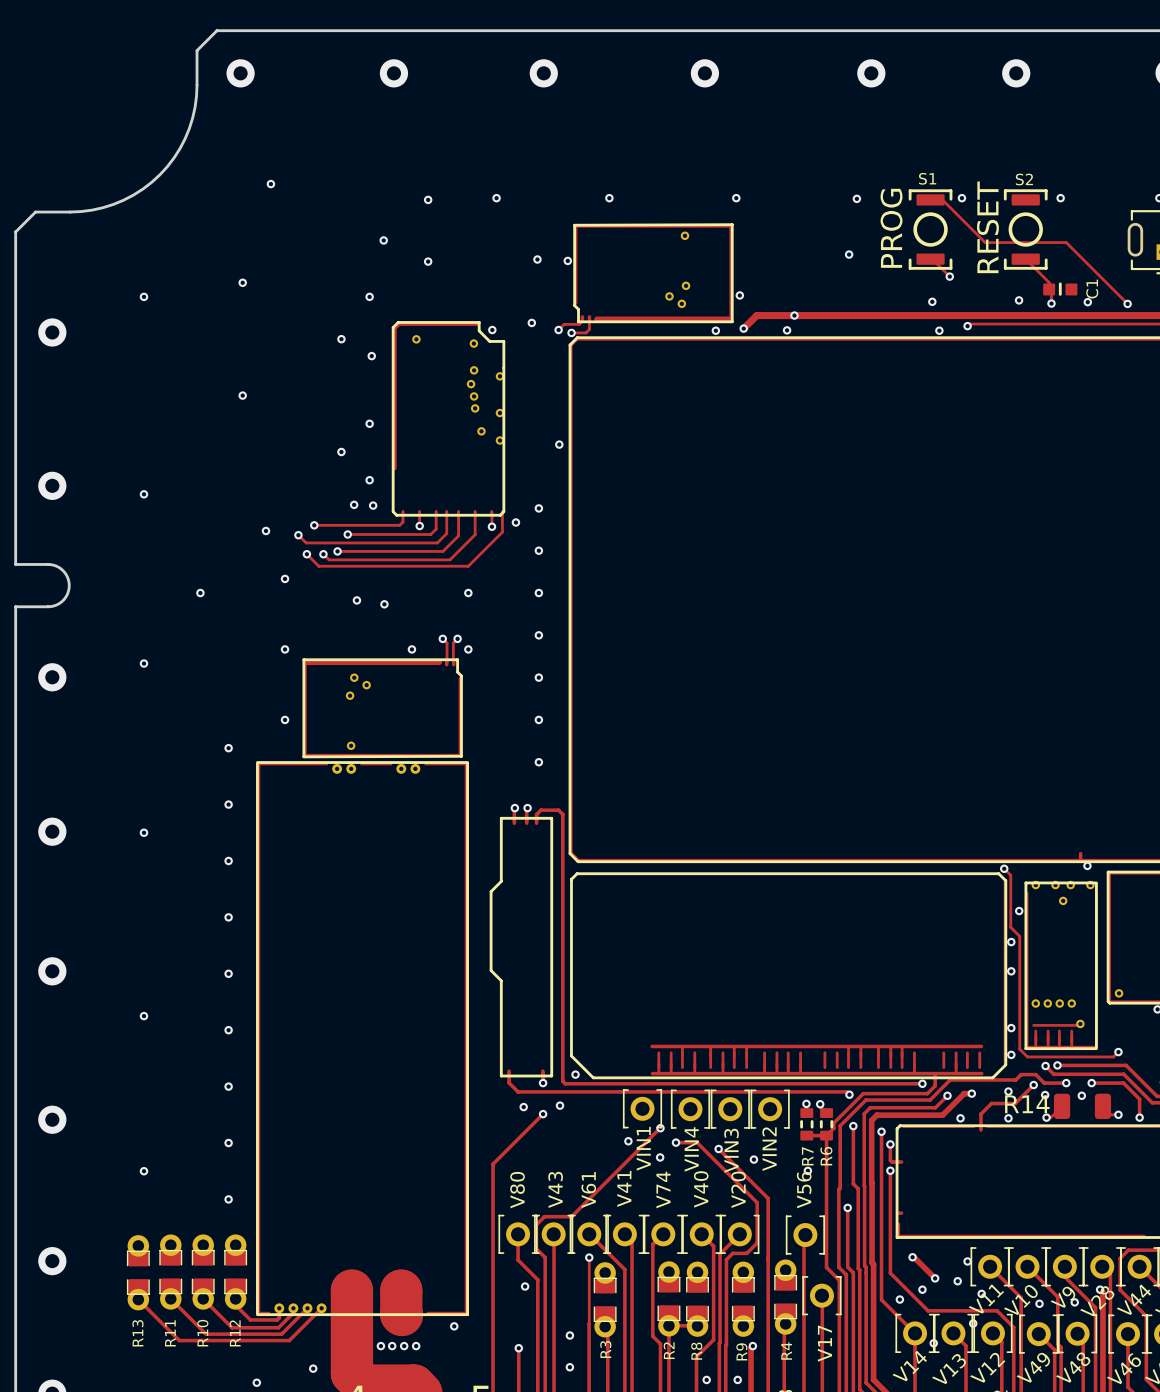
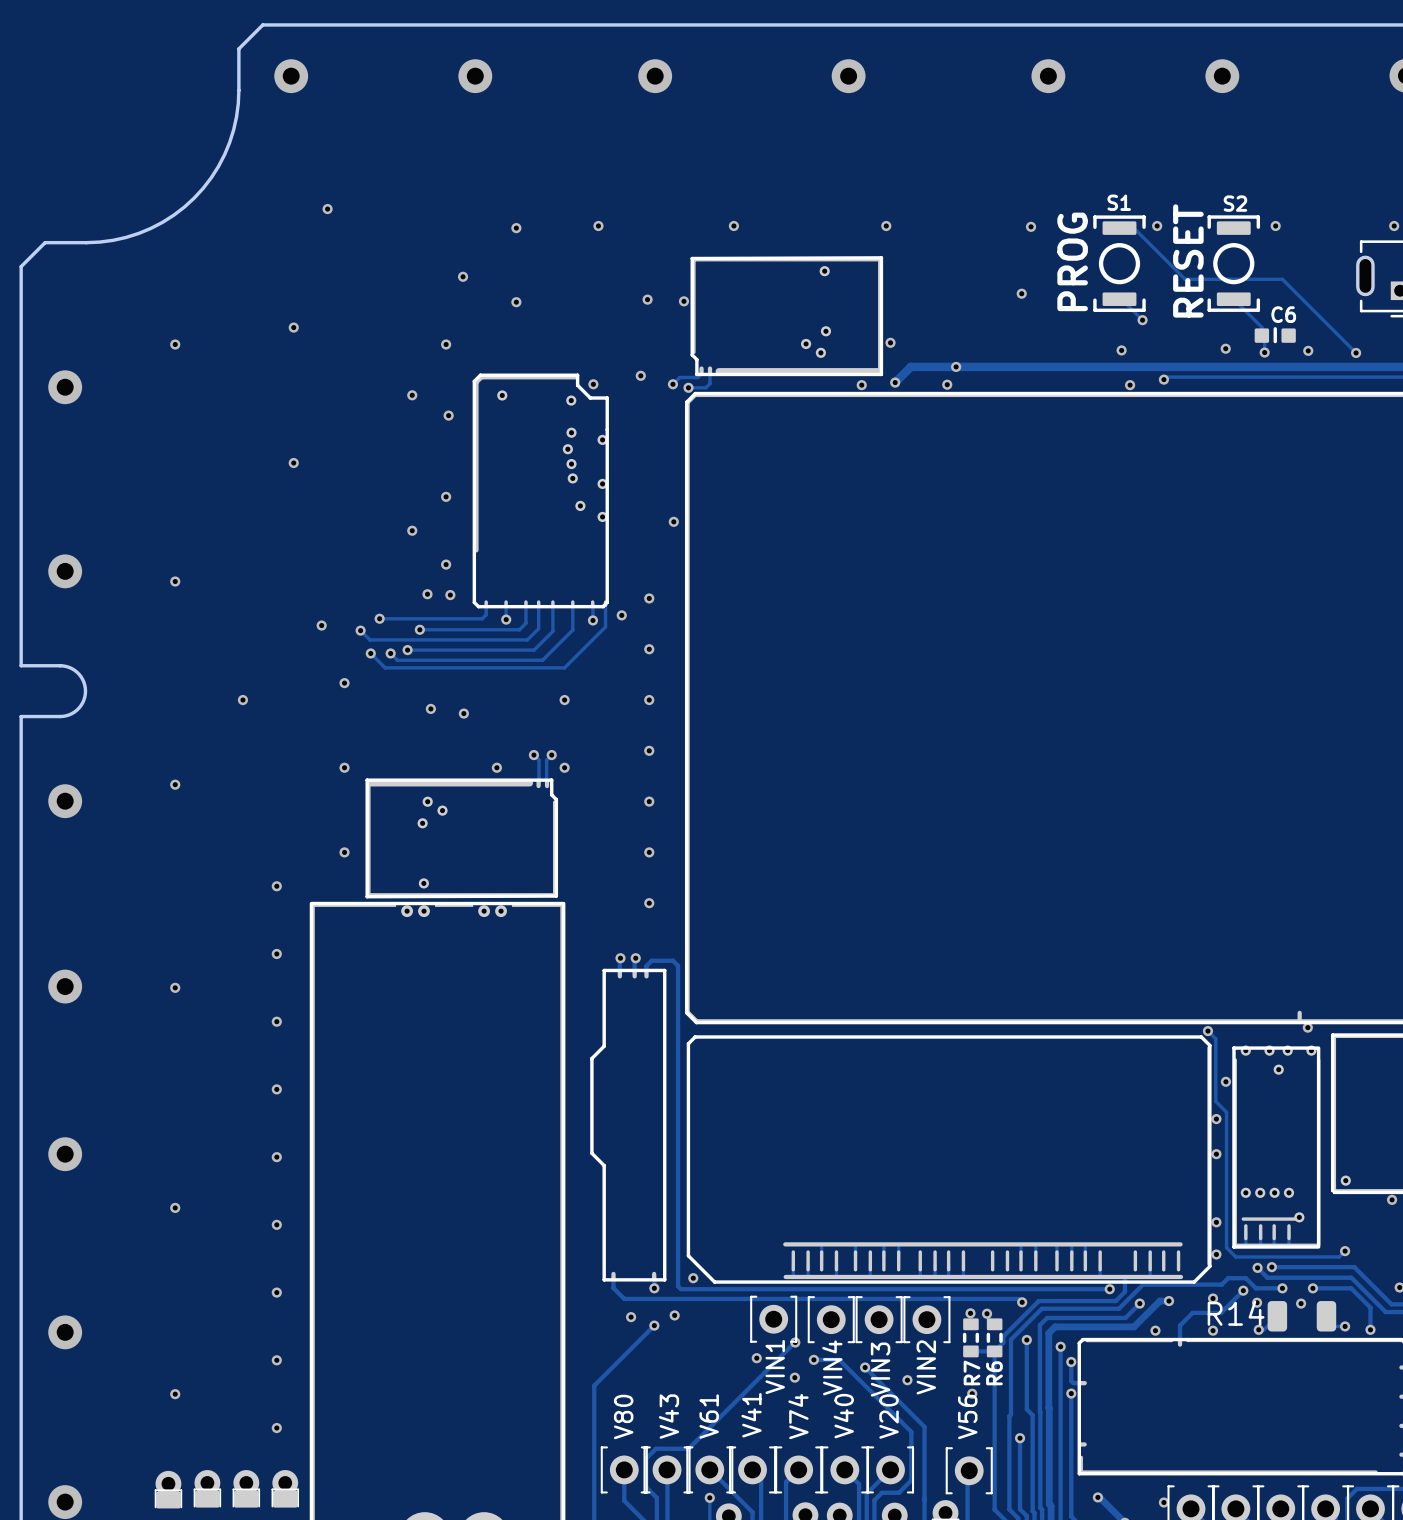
C1 name: C1 (1092, 289) -> C6 (1283, 314)

